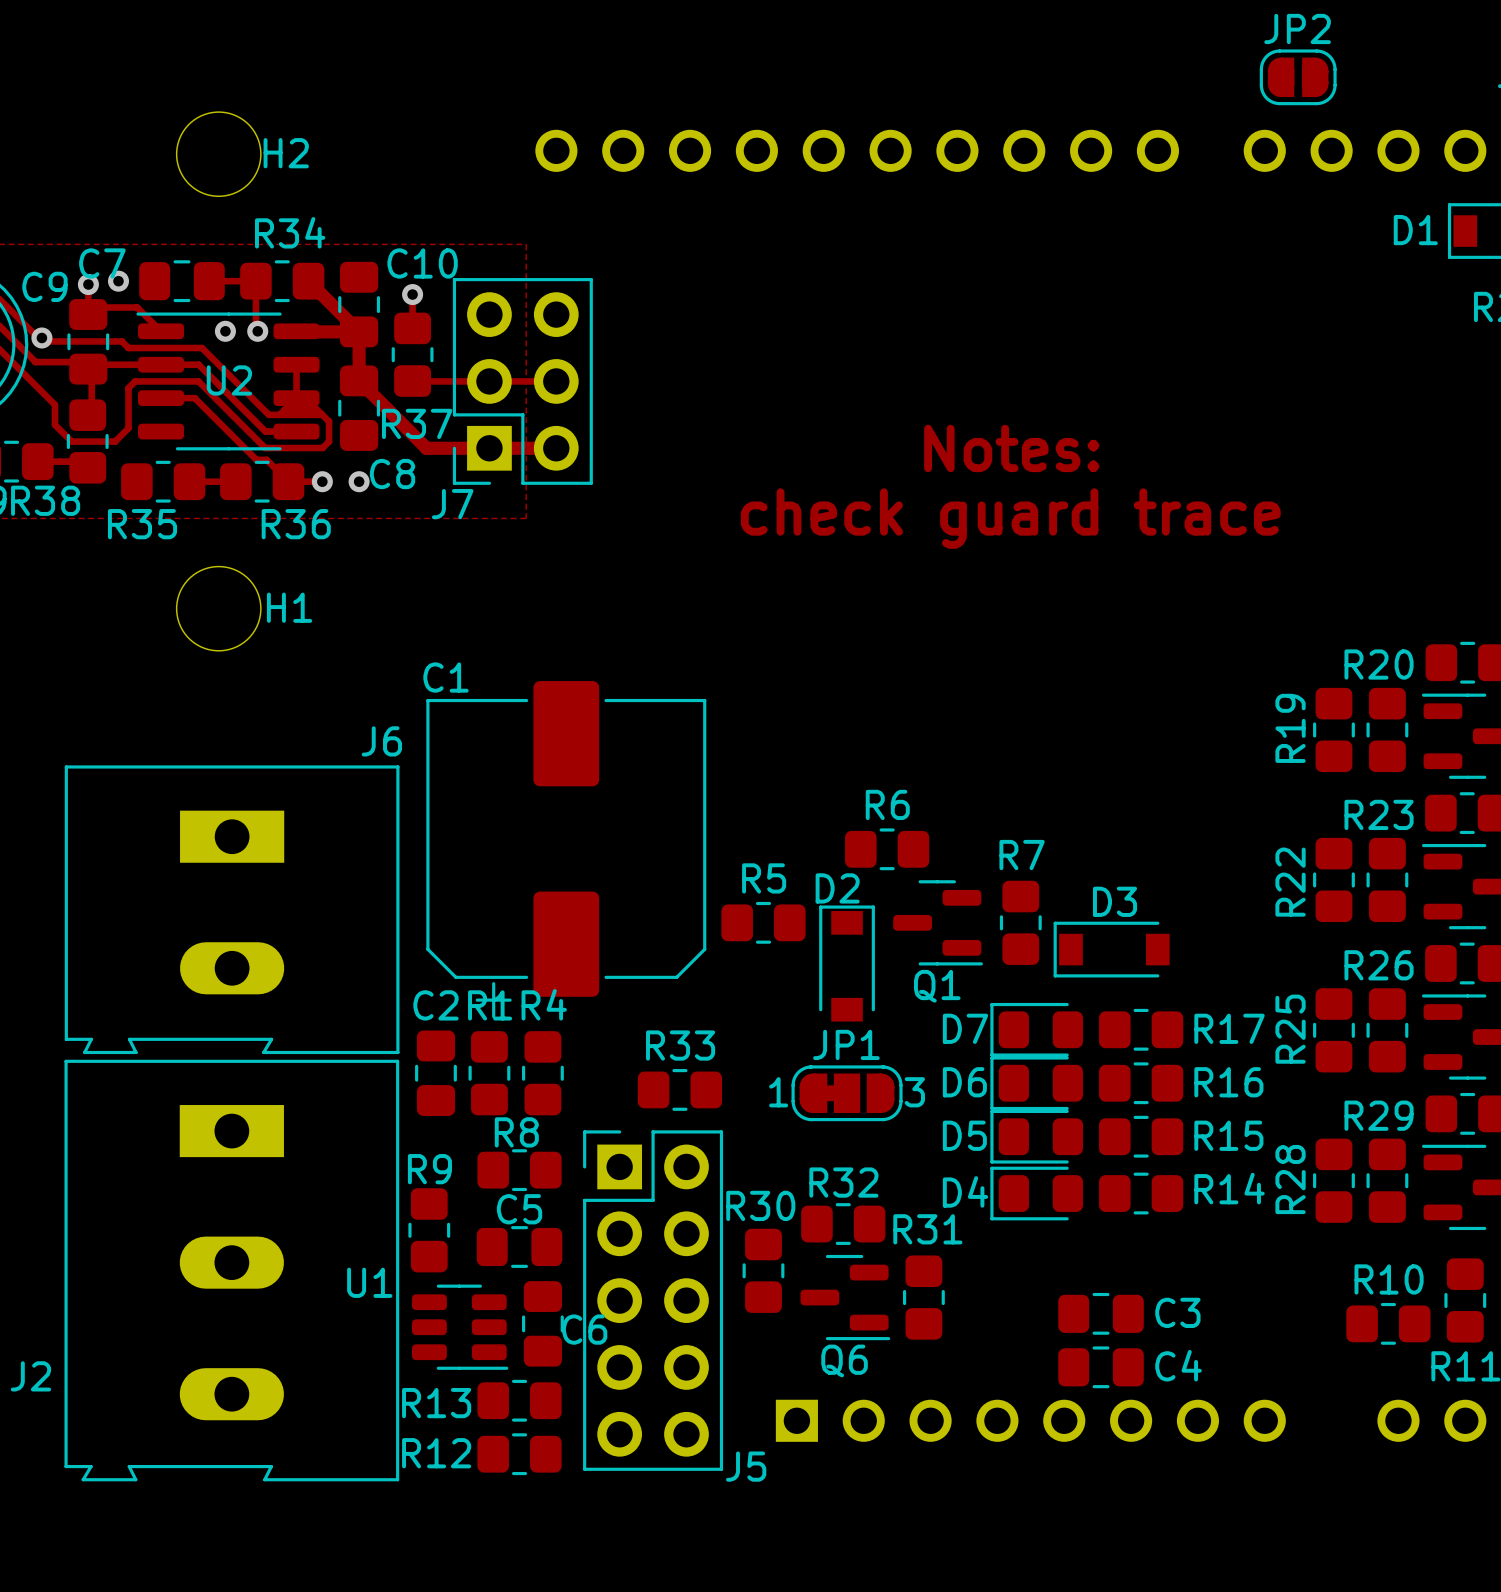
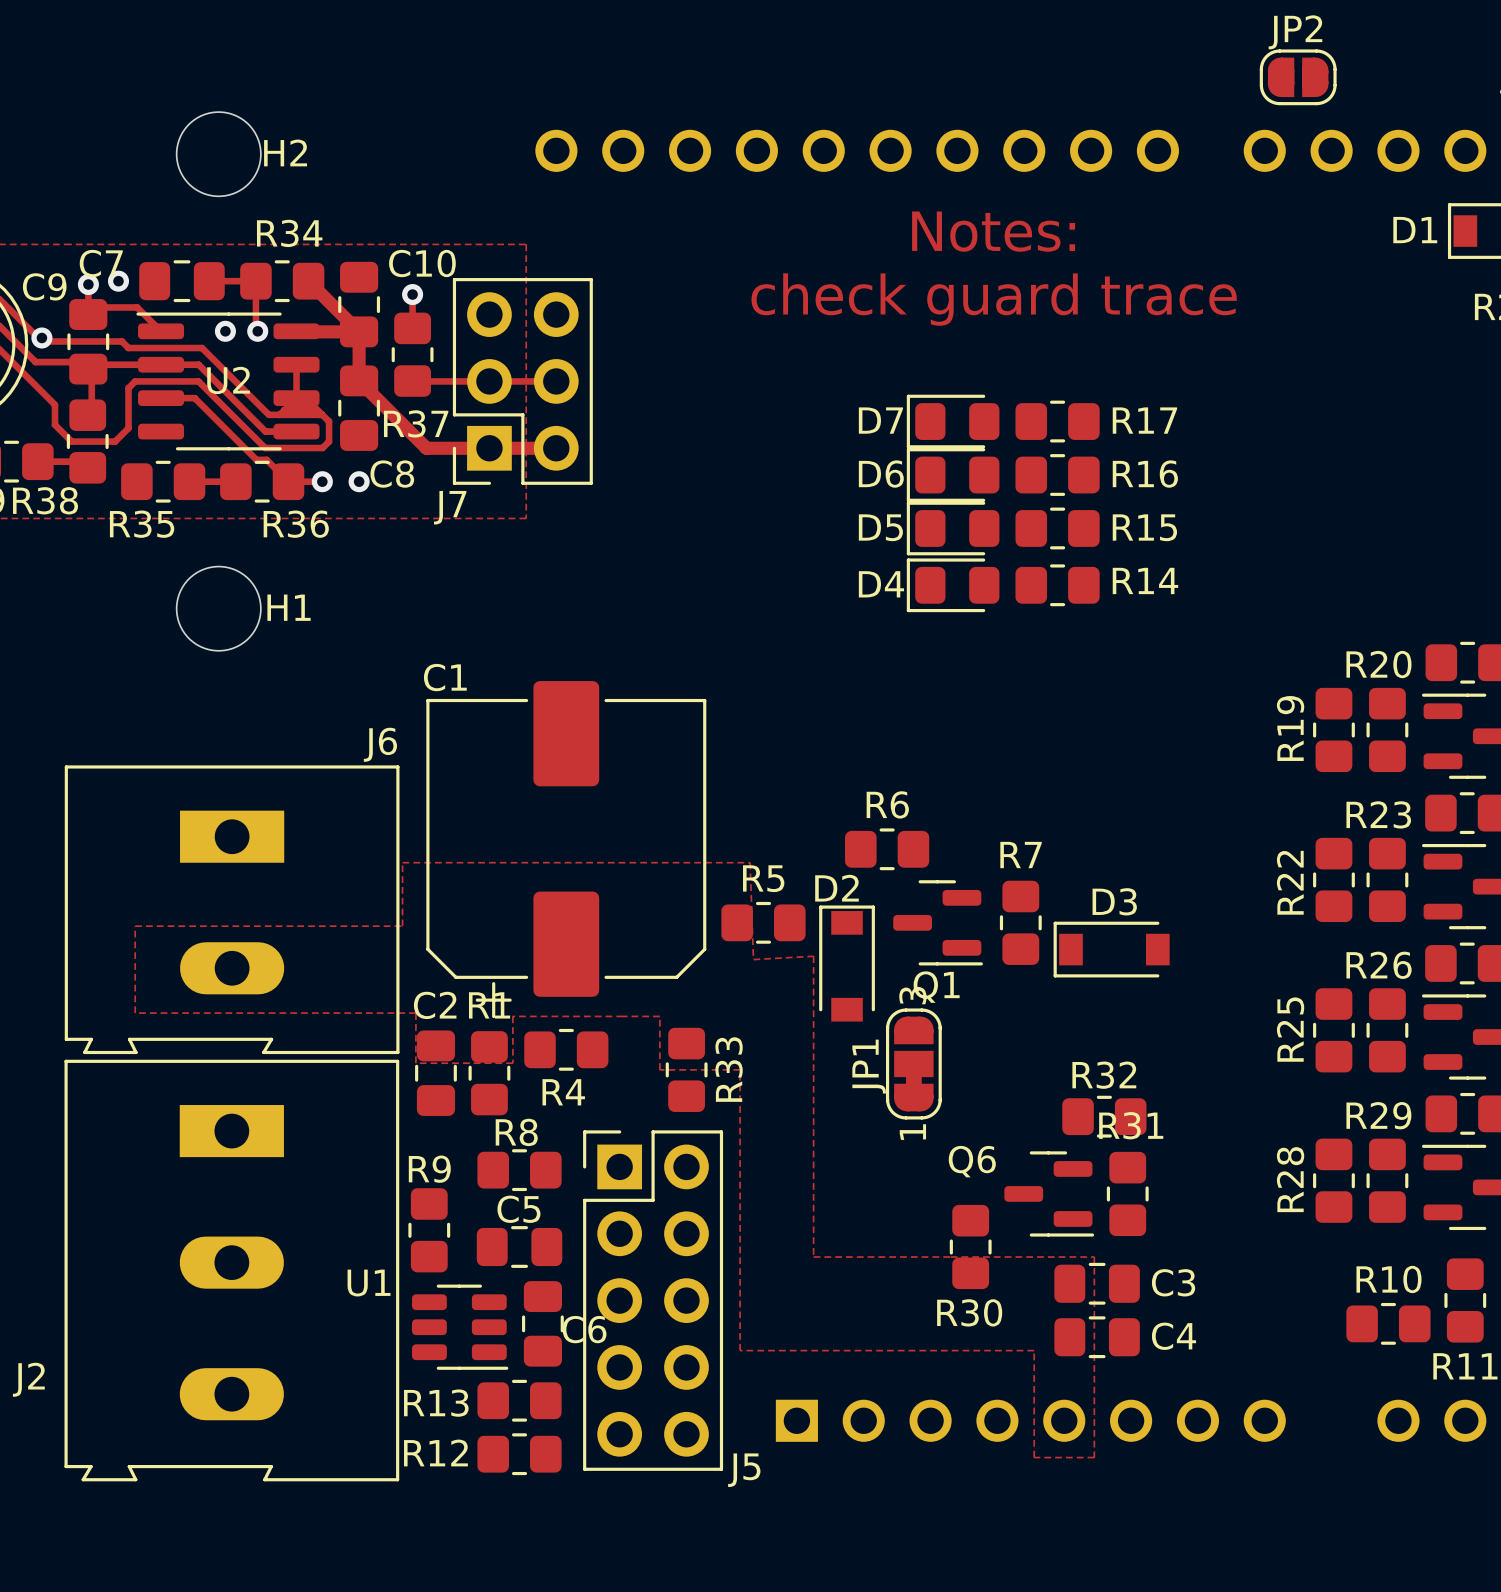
text position: Notes: (1011, 448) -> Notes: (993, 231)
text position: check guard trace (1010, 518) -> check guard trace (994, 299)
zone outline: none -> (402, 862) (402, 926) (135, 926) (135, 1013) (415, 1013) (415, 1063) (512, 1063) (512, 1016) (659, 1016) (659, 1069) (740, 1069) (740, 1350) (1034, 1350) (1034, 1457) (1094, 1457) (1094, 1257) (813, 1257) (813, 956) (753, 959) (750, 862) (402, 862)
R4 name position: R4 (544, 1004) -> R4 (563, 1092)
D7 position: (1036, 1029) -> (953, 421)
R17 position: (1141, 1029) -> (1057, 421)
R4 rotation: 0° (542, 1073) -> 90° clockwise (566, 1049)
D6 position: (1036, 1083) -> (953, 475)
R16 position: (1141, 1083) -> (1057, 475)
R33 rotation: 0° (679, 1089) -> 90° clockwise (686, 1069)
JP1 rotation: 0° (847, 1093) -> 90° counterclockwise (913, 1063)
JP1 position: (847, 1093) -> (913, 1063)
D5 position: (1036, 1136) -> (953, 528)
R15 position: (1141, 1136) -> (1057, 528)
D4 position: (1036, 1193) -> (953, 585)
R14 position: (1141, 1193) -> (1057, 585)
R30 name position: R30 (760, 1205) -> R30 (969, 1312)
R32 position: (843, 1224) -> (1104, 1116)
R30 position: (763, 1270) -> (970, 1247)
Q6 position: (845, 1297) -> (1049, 1193)
R31 position: (923, 1297) -> (1127, 1193)
C3 position: (1101, 1313) -> (1097, 1283)
Q6 name position: Q6 (844, 1360) -> Q6 (972, 1161)
C4 position: (1101, 1367) -> (1097, 1337)

